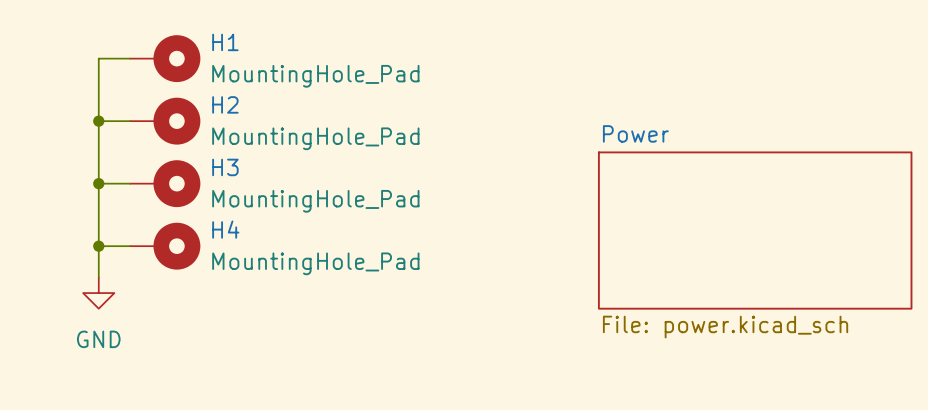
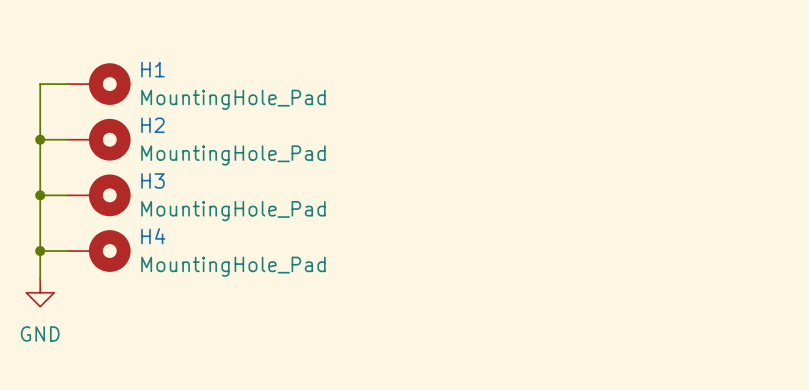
sheet Power: File: power.kicad_sch (755, 230) -> none

